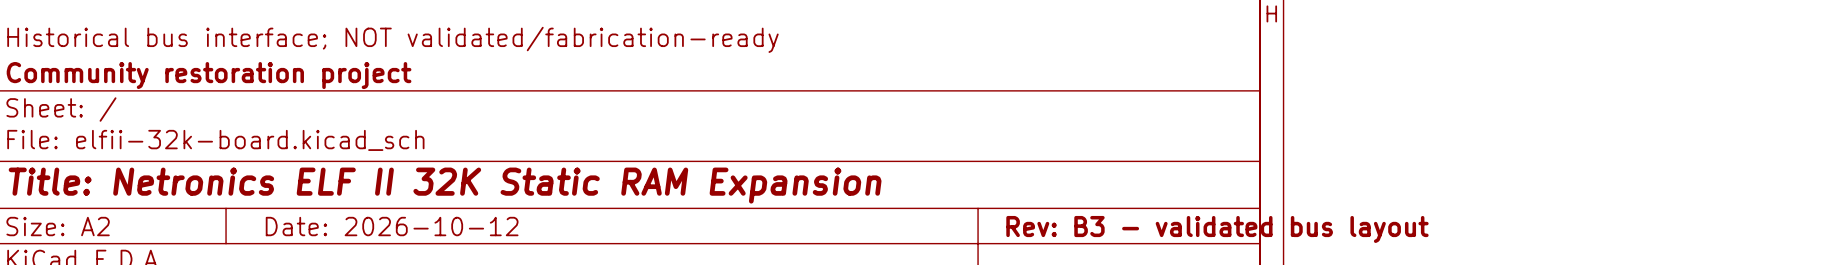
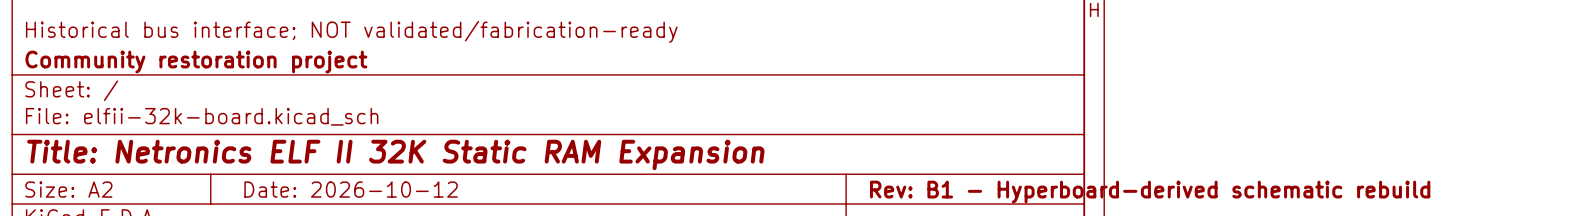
title block: Rev: B3 - validated bus layout (1217, 229) -> Rev: B1 - Hyperboard-derived schematic rebuild (1150, 192)

